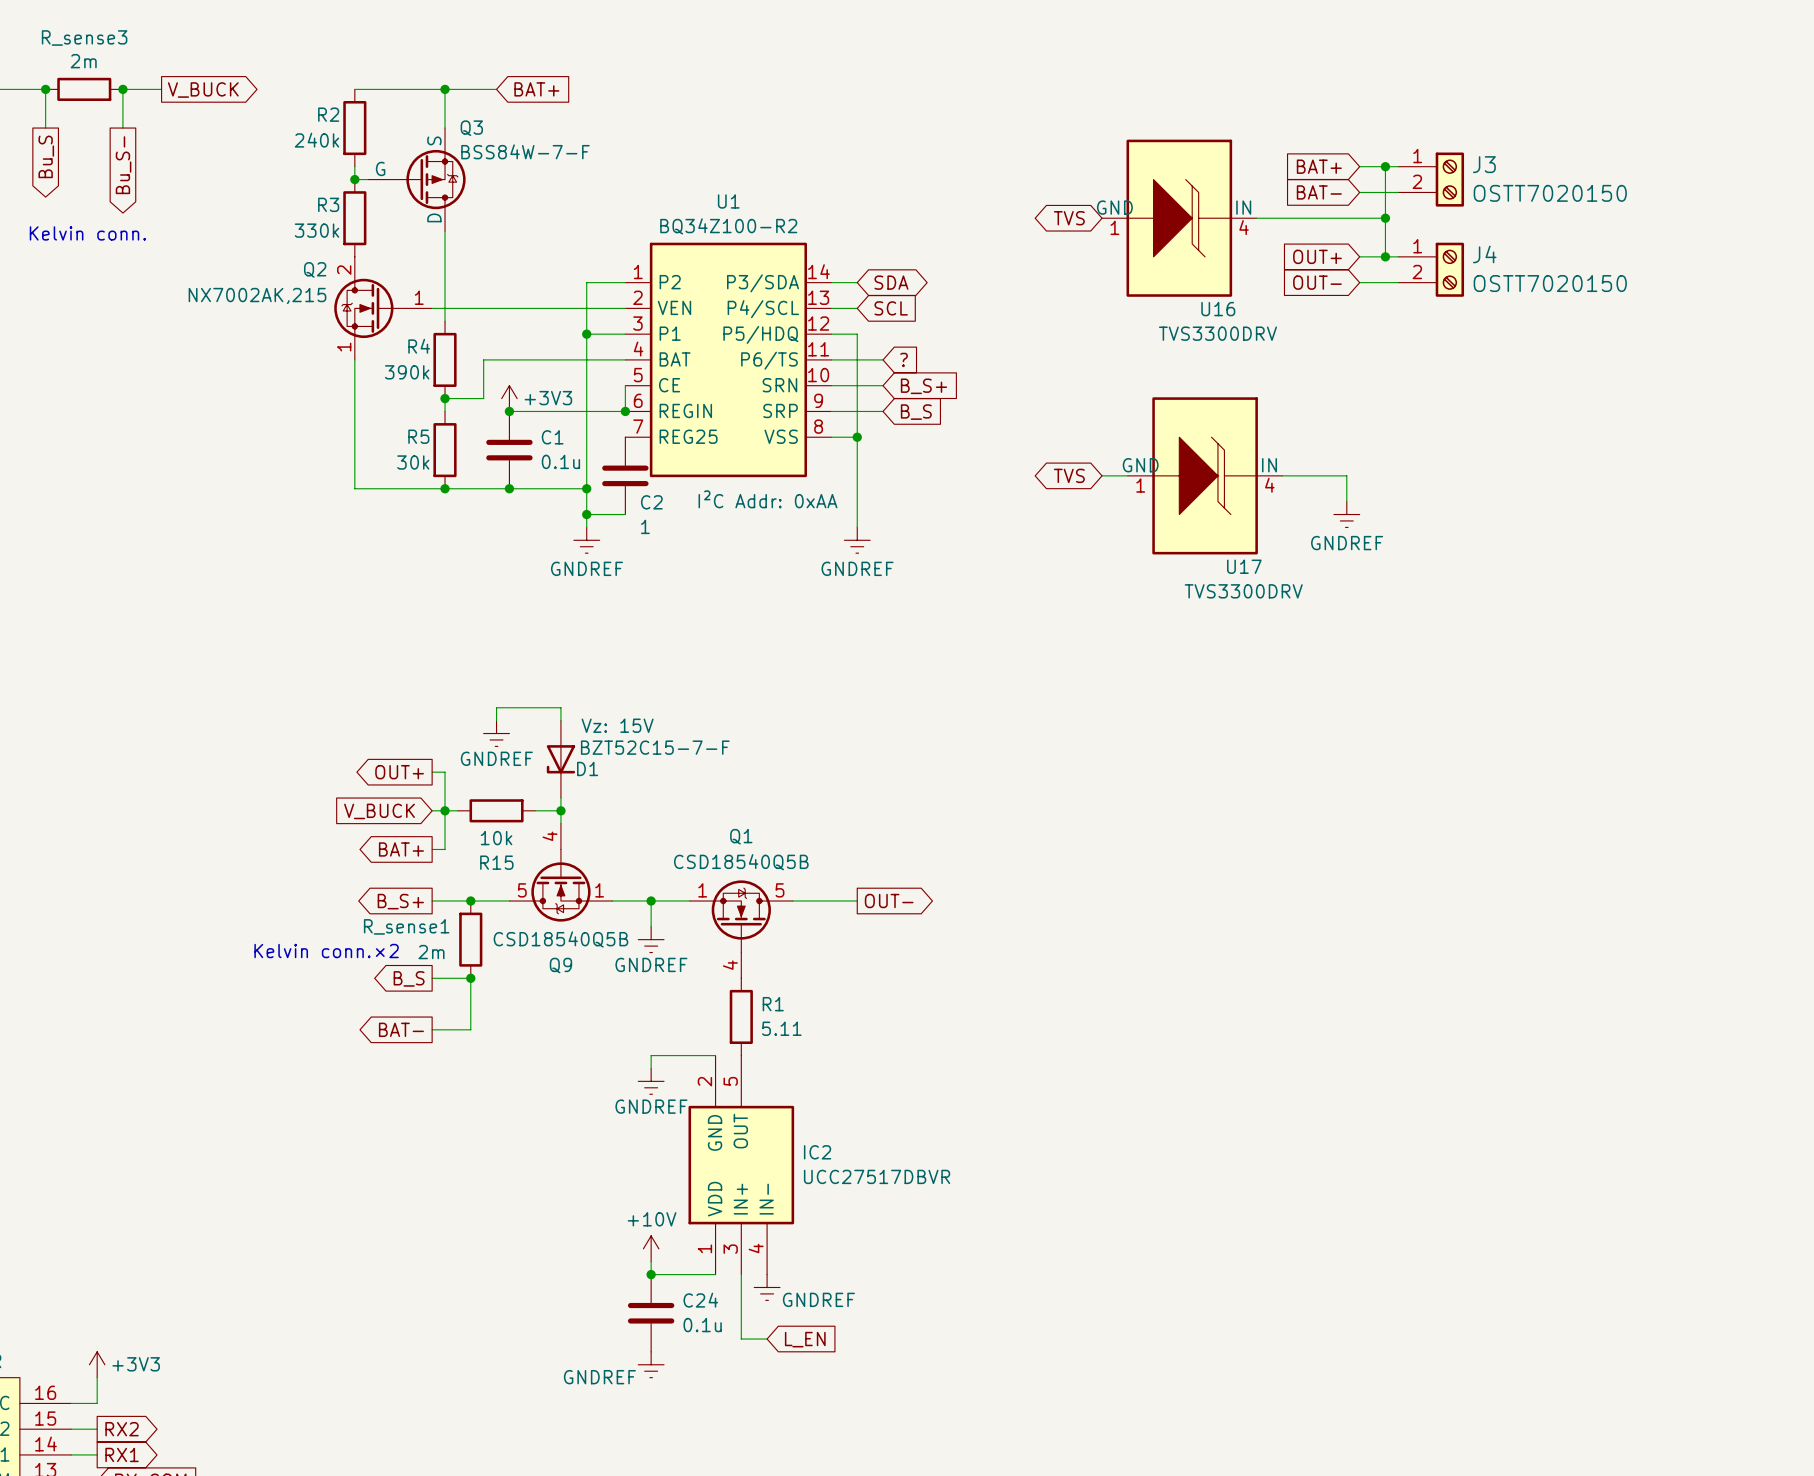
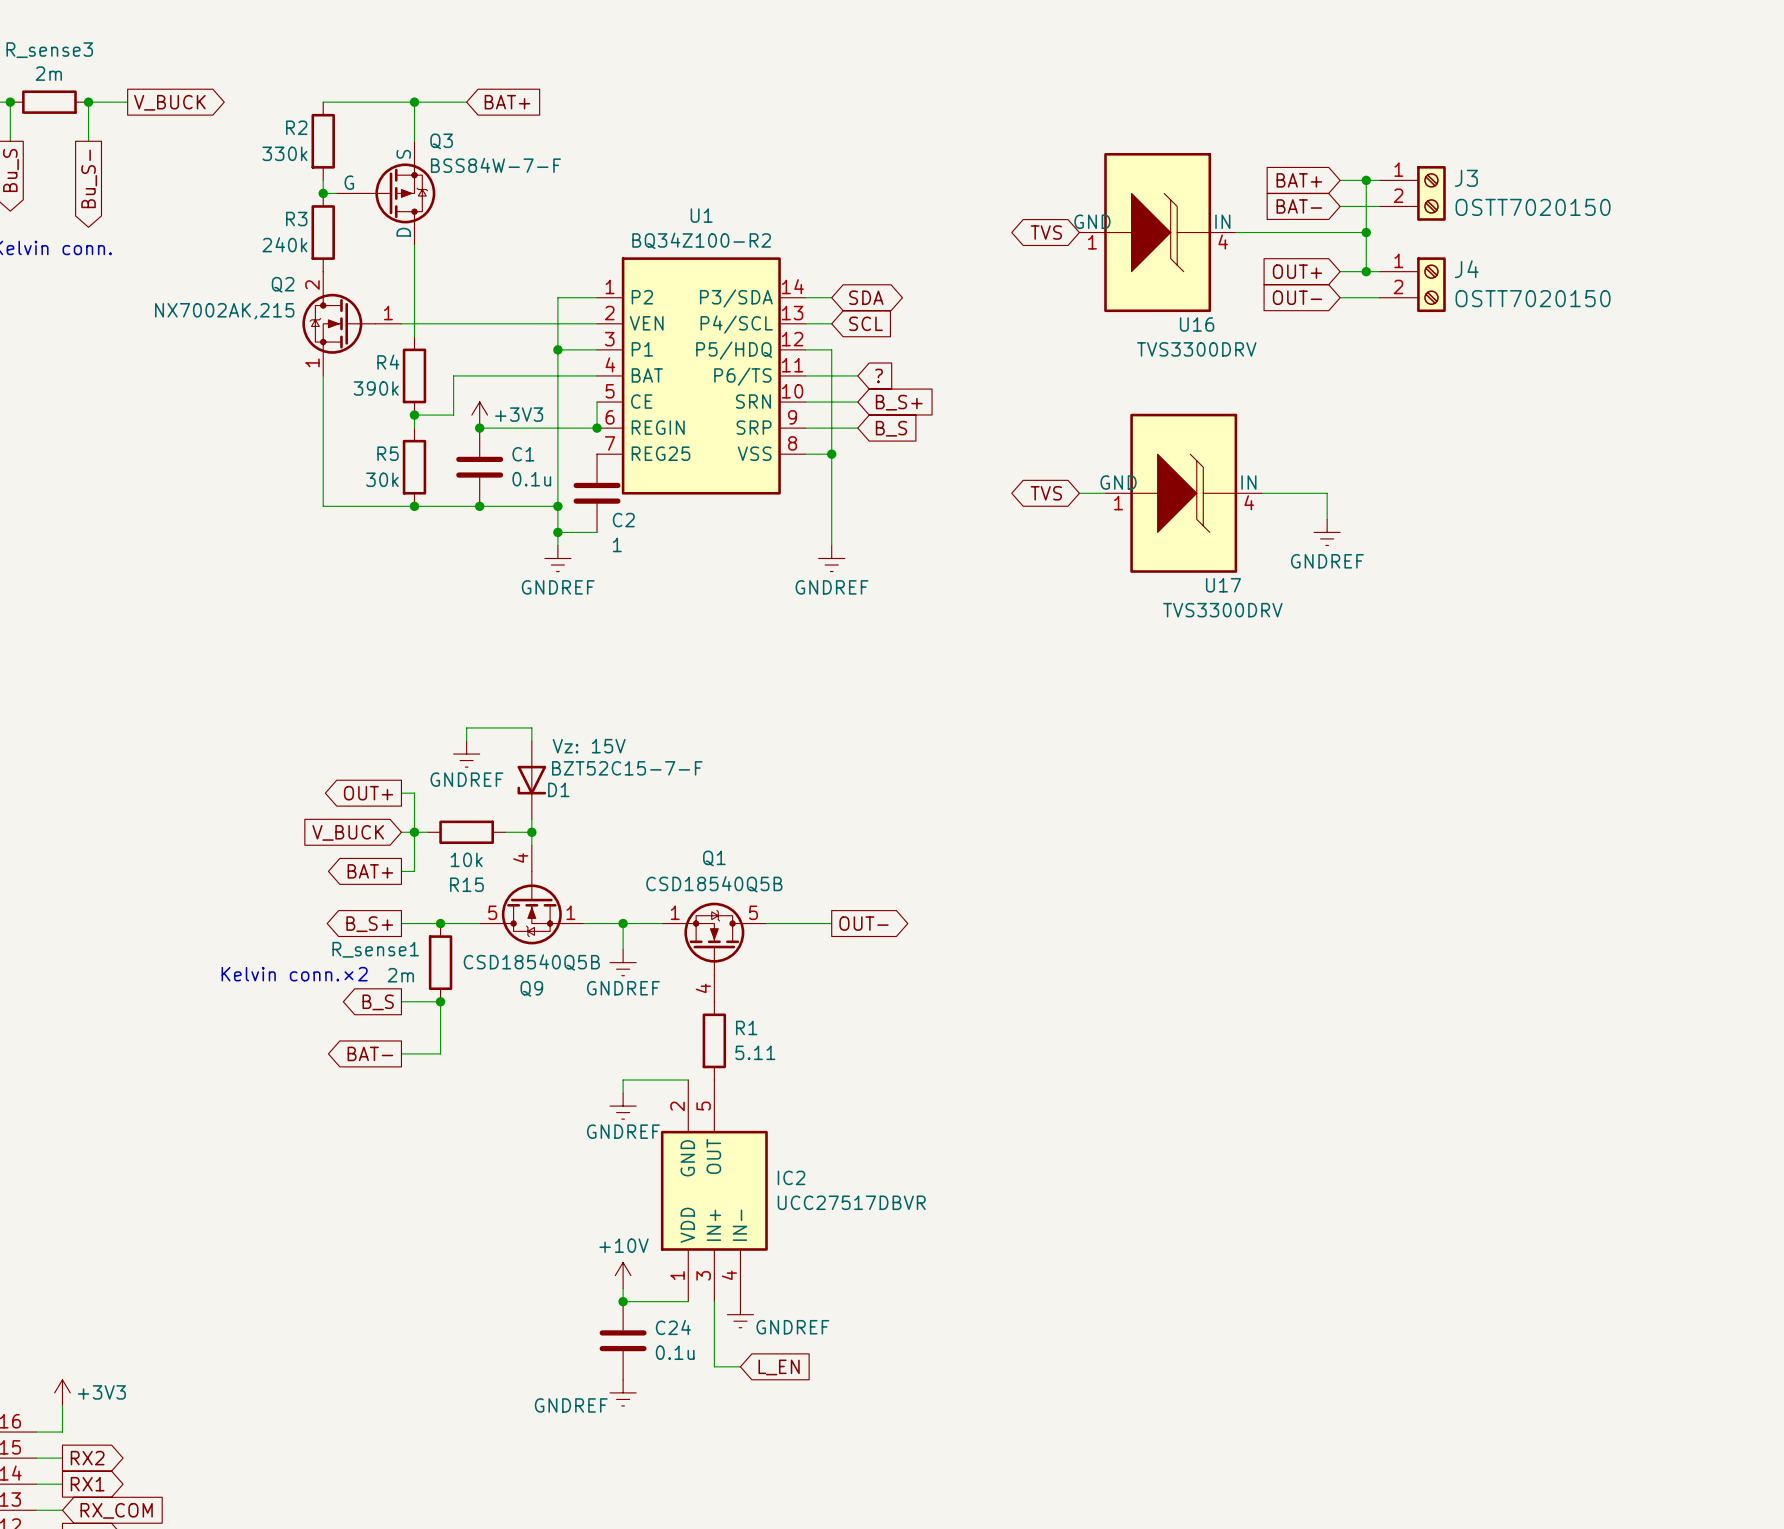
R2 value: 240k (317, 140) -> 330k (284, 153)
R3 value: 330k (317, 230) -> 240k (284, 244)
U1 text: I²C Addr: 0xAA (768, 499) -> none

